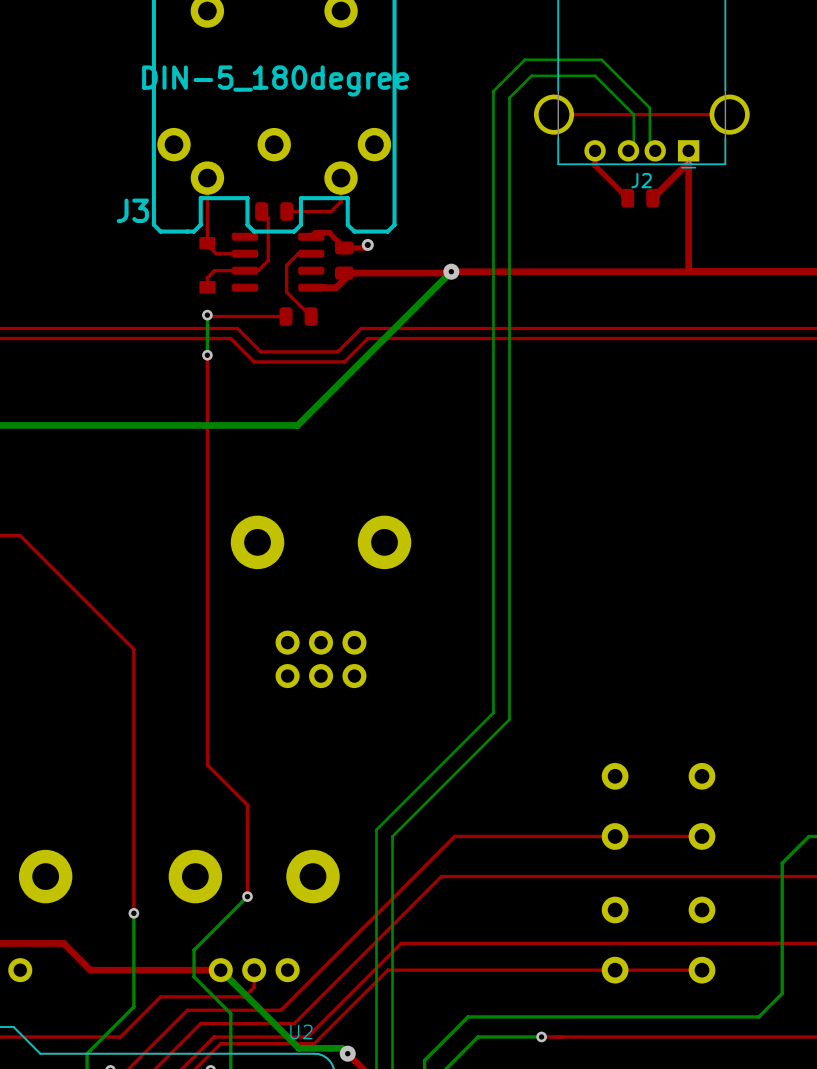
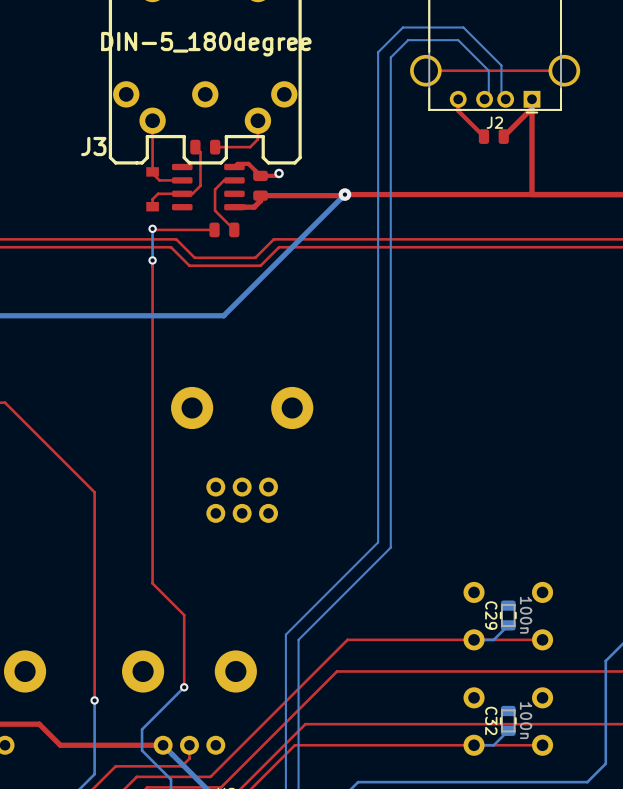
C29: none -> 100n (508, 615)
bottom track: none -> (508, 625) (493, 639) (474, 639)
C32: none -> 100n (508, 720)
bottom track: none -> (508, 730) (493, 745) (474, 745)

